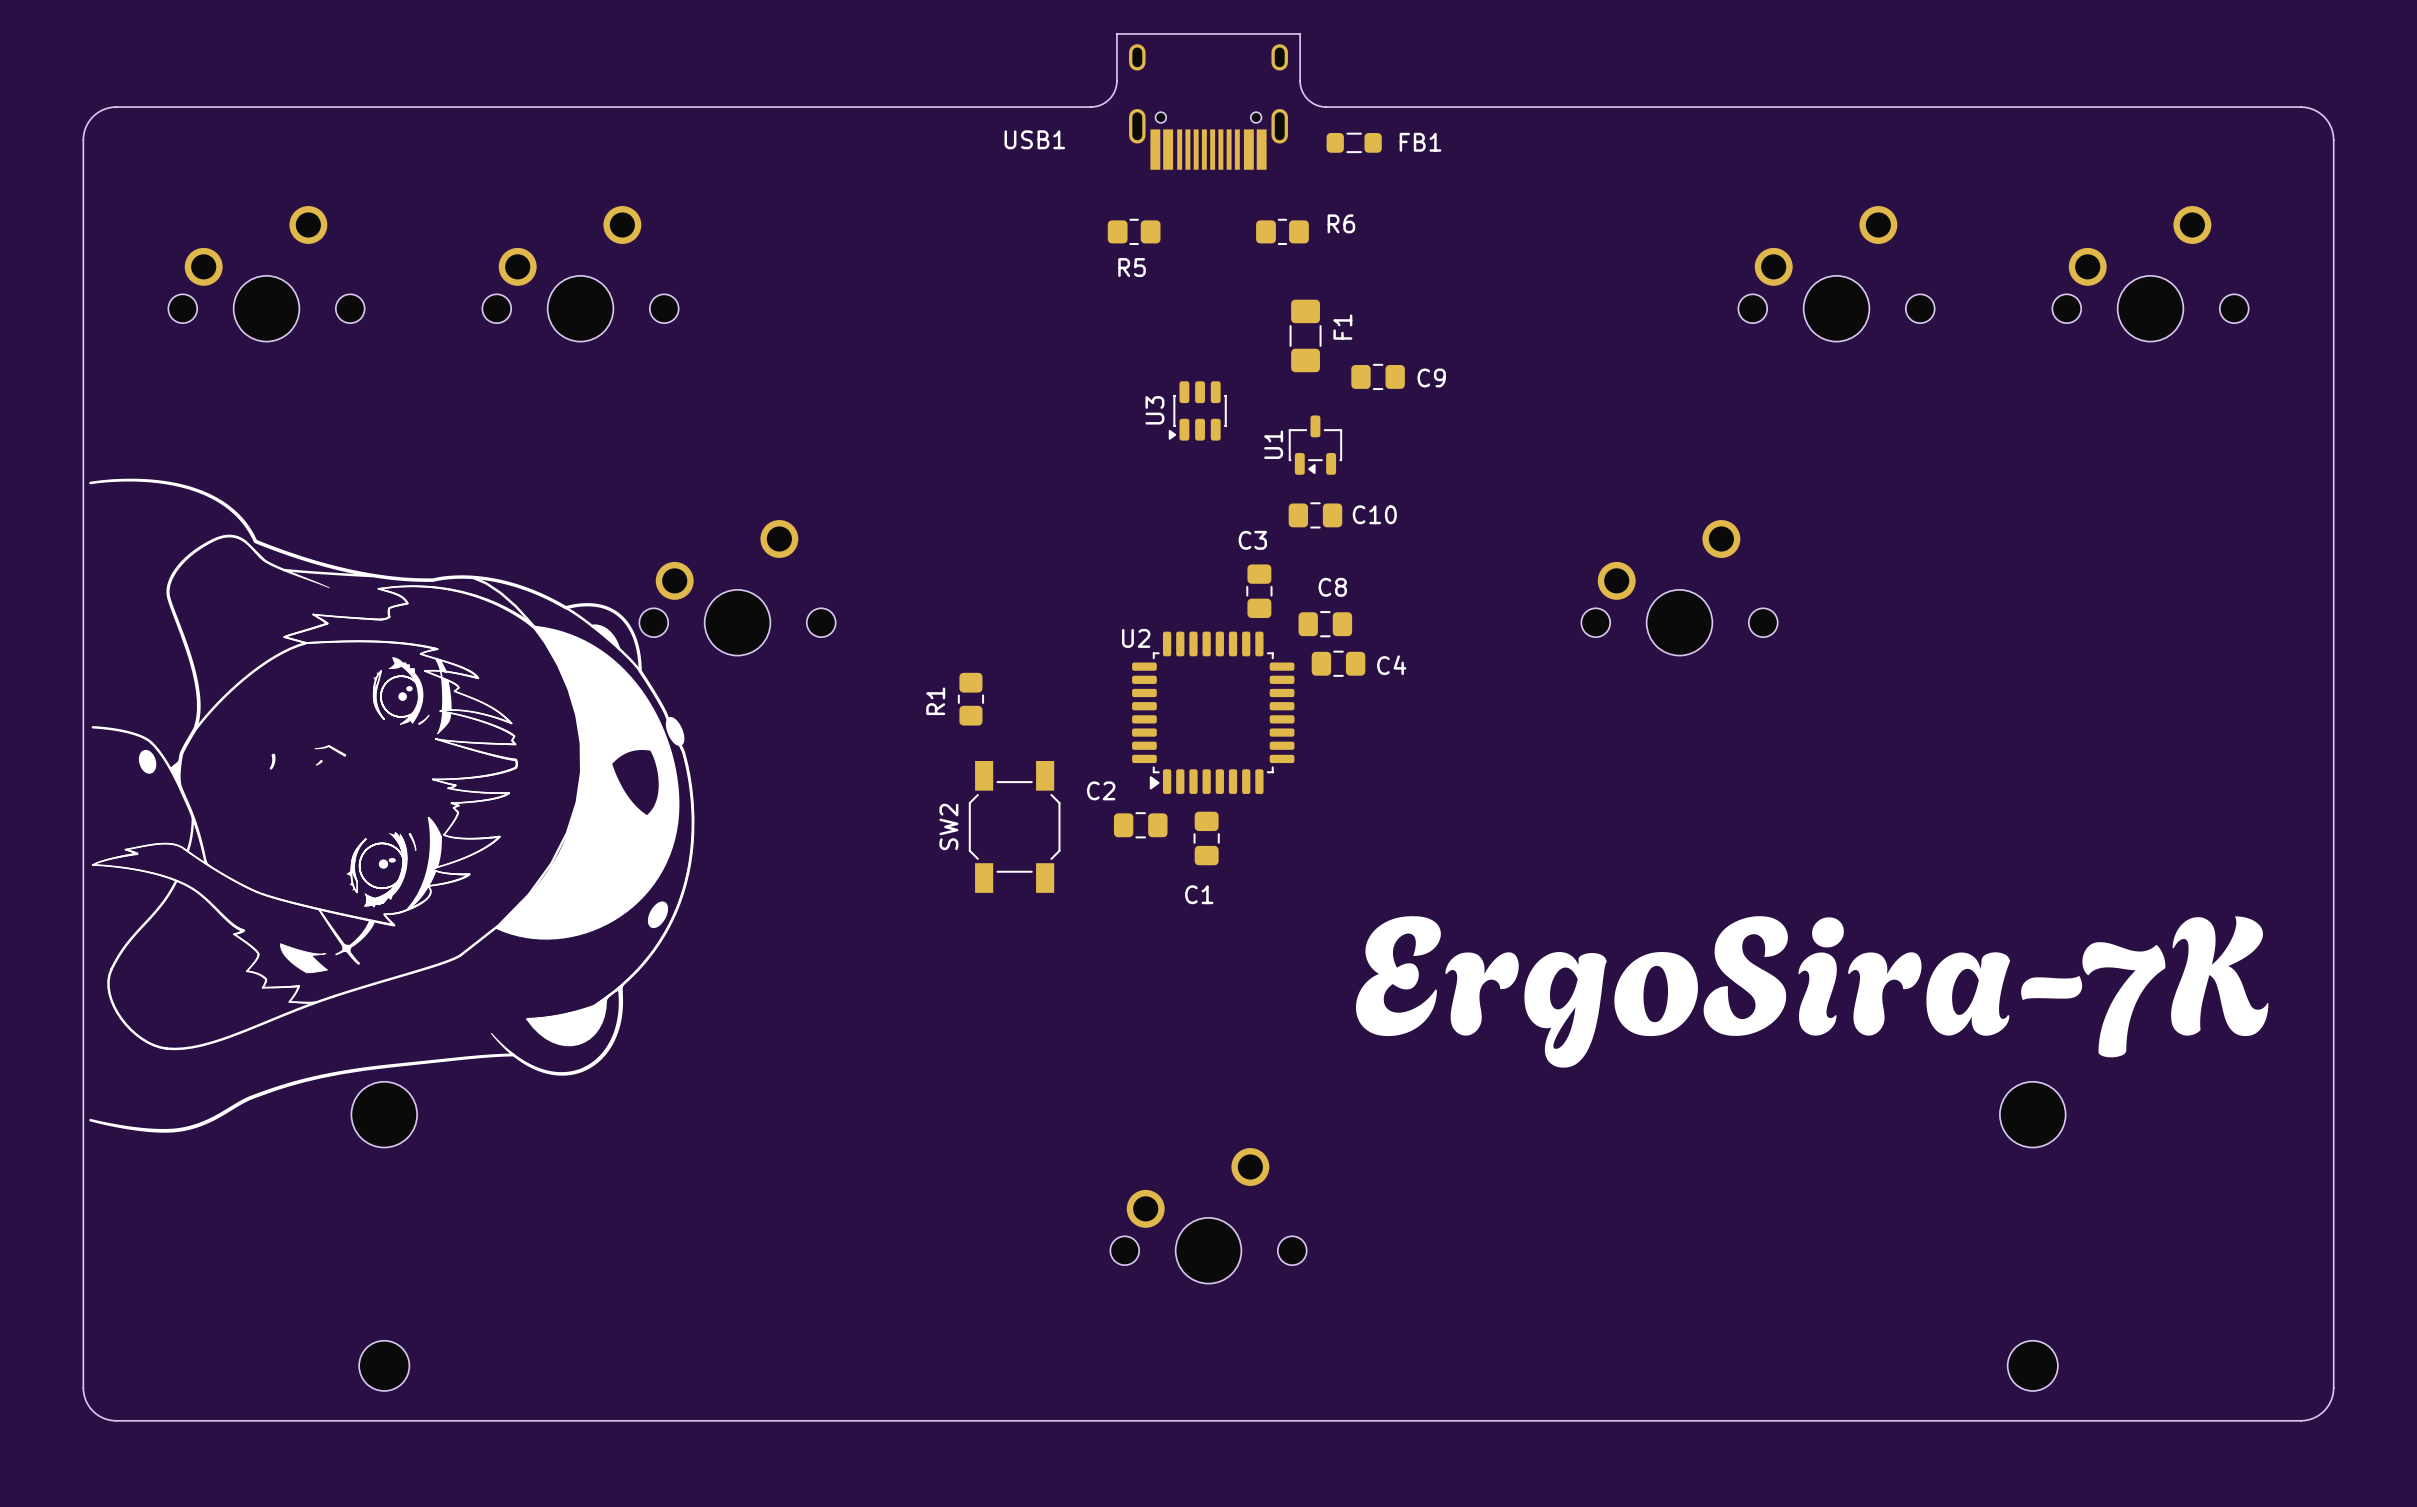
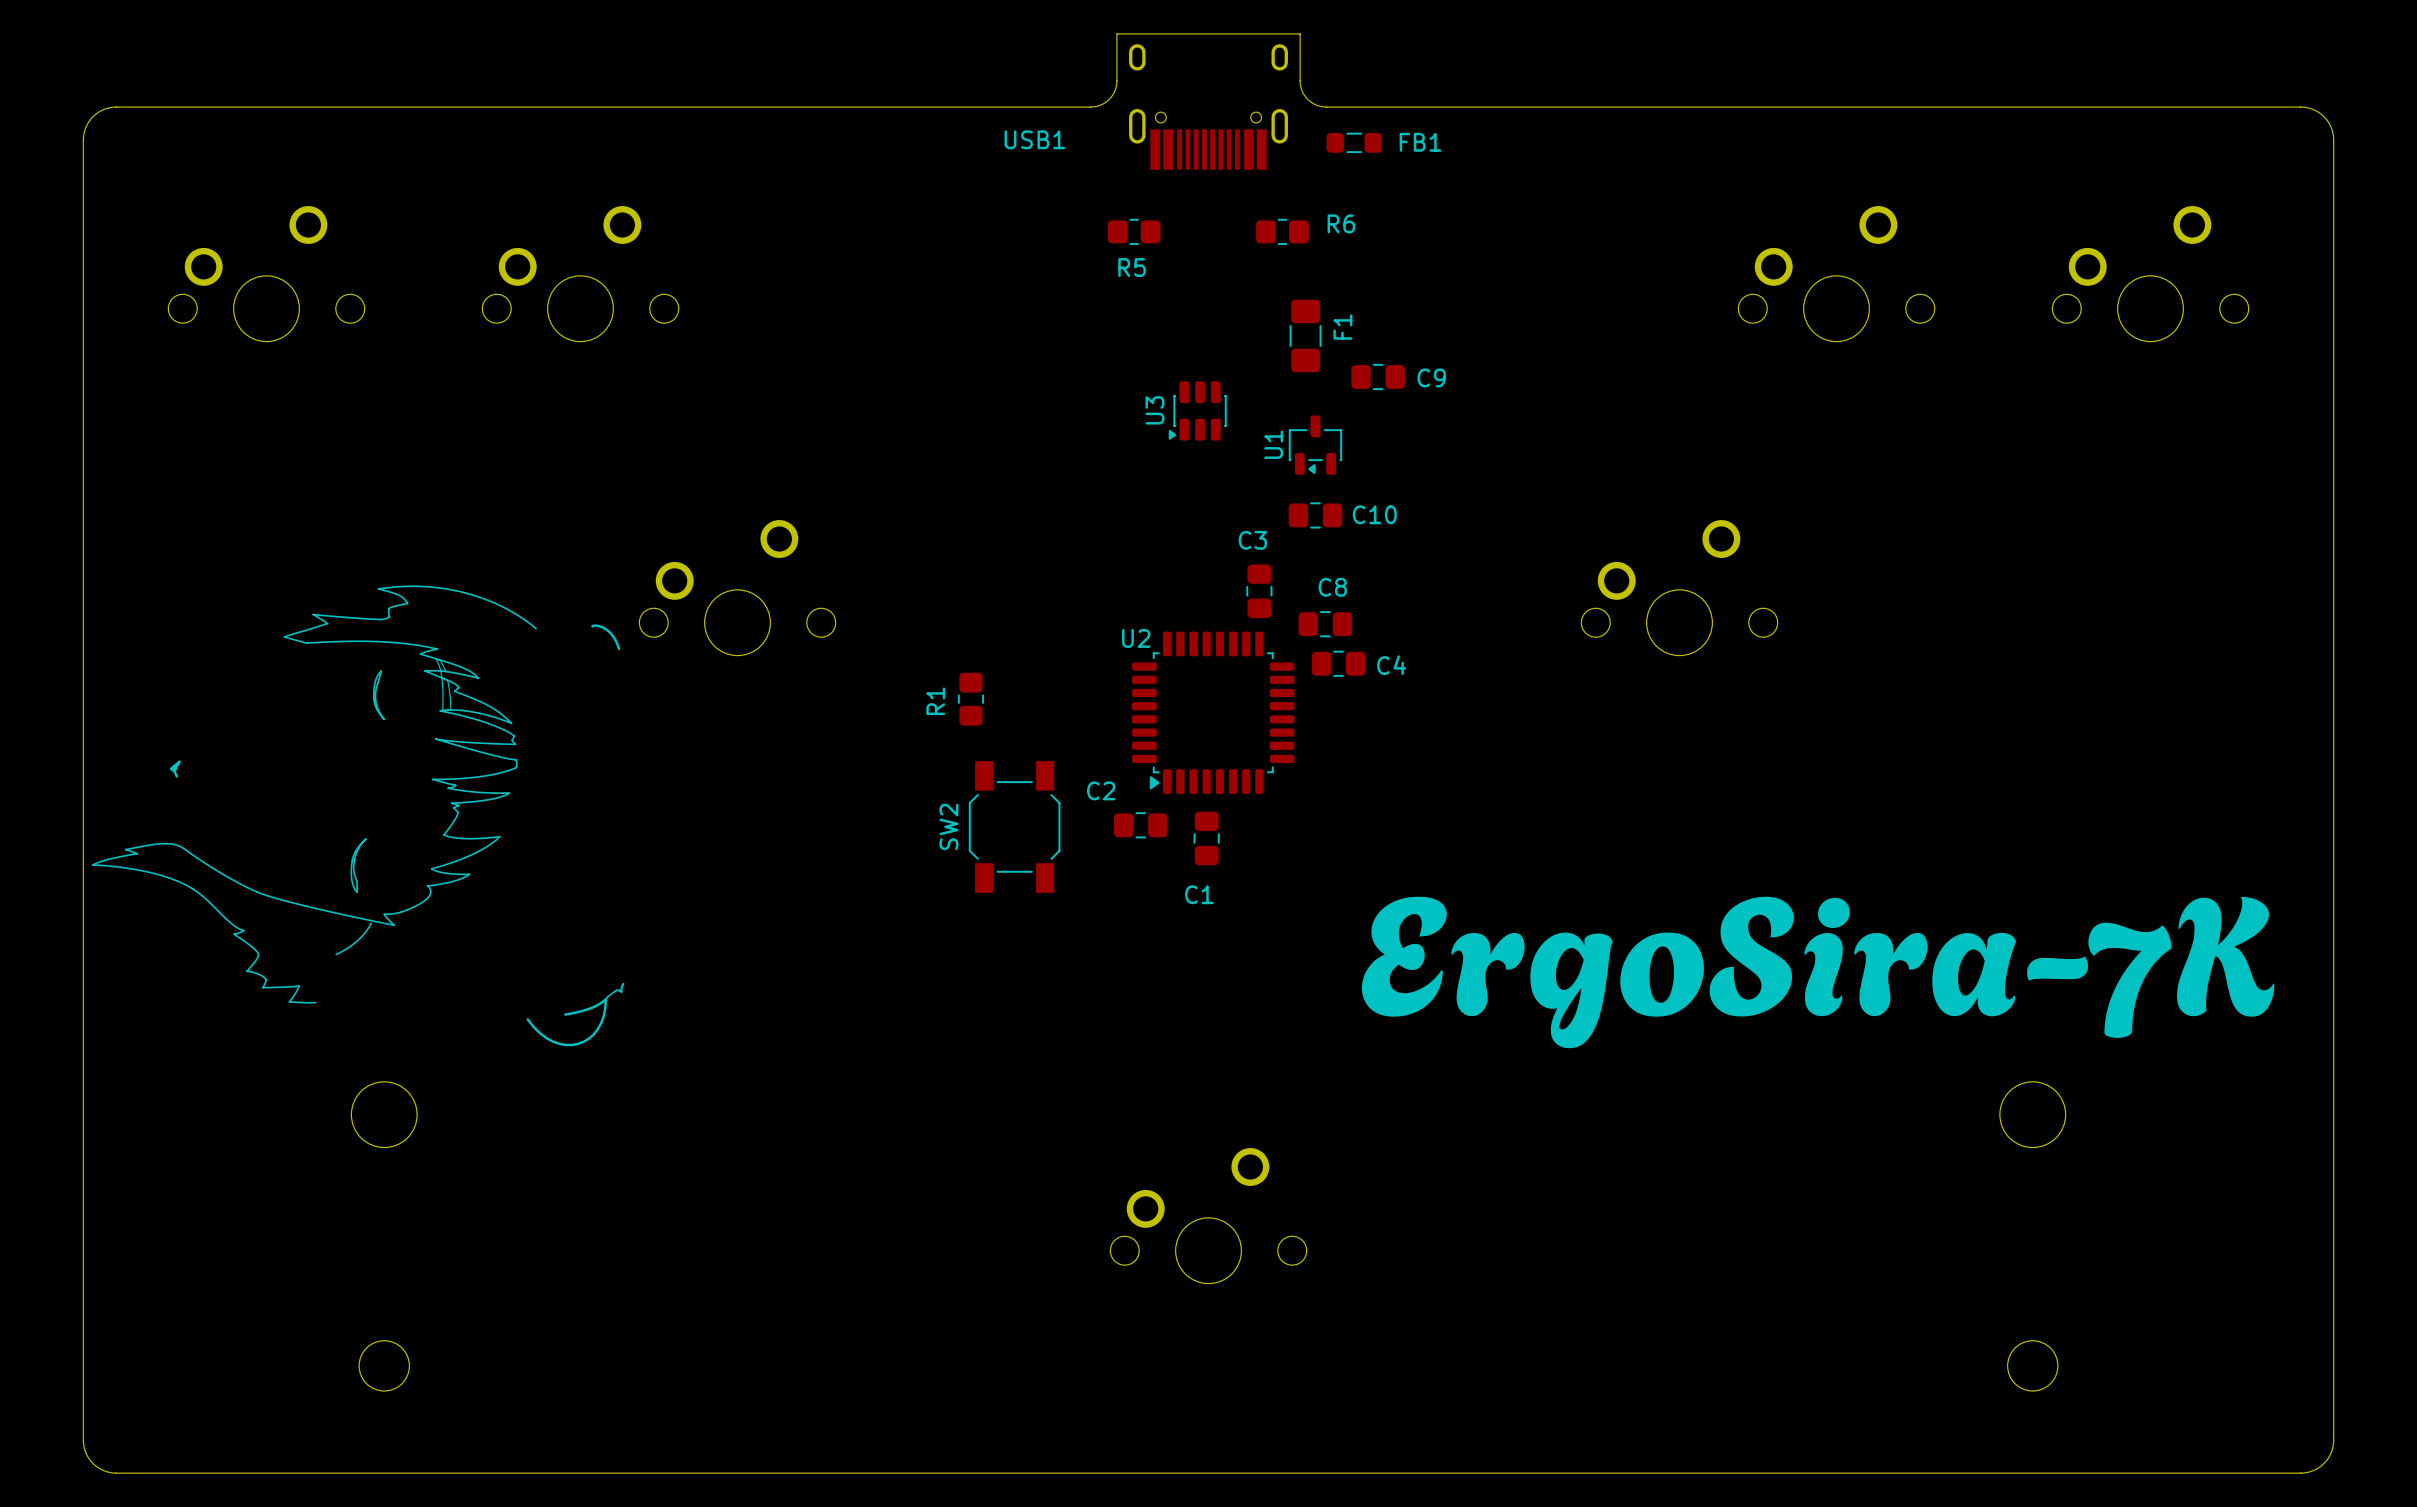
board edge: (2300, 107) (2313, 109) (2324, 116) (2331, 127) (2333, 140) (2333, 1387) (2328, 1405) (2318, 1415) (2300, 1420) (116, 1420) (102, 1417) (93, 1411) (86, 1402) (83, 1387) -> (2300, 107) (2315, 110) (2324, 116) (2331, 129) (2333, 140) (2333, 1440) (2328, 1457) (2318, 1468) (2300, 1473) (116, 1473) (98, 1468) (90, 1460) (85, 1451) (83, 1440) (83, 1387)
drawing: [89, 478, 695, 1133] -> none
line: (283, 570) (371, 576) -> none
line: (472, 577) (500, 593) (531, 623) (557, 664) (568, 689) (576, 715) (580, 743) (581, 772) (576, 802) (567, 833) (551, 864) (528, 894) (498, 925) (454, 958) (321, 1000) (220, 1039) (192, 1047) (174, 1048) (154, 1045) (130, 1029) (114, 1006) (109, 993) (108, 981) (111, 969) (122, 949) (160, 905) (176, 881) -> none
line: (565, 607) (611, 642) (641, 673) -> none
line: (306, 643) (283, 652) (252, 672) (223, 697) (196, 728) -> none
line: (399, 676) (391, 678) (385, 683) (381, 690) (381, 698) (383, 706) (388, 712) (395, 716) (403, 716) (411, 714) (417, 709) (420, 702) (421, 694) (419, 686) (414, 680) (407, 677) (399, 676) -> none
line: (92, 727) (121, 730) (145, 738) (161, 755) (180, 788) (176, 776) -> none
line: (192, 816) (187, 850) -> none
line: (428, 817) (430, 842) (427, 871) (418, 894) (407, 909) (426, 889) (435, 871) (430, 868) (436, 867) (438, 860) (441, 837) (428, 817) -> none
line: (379, 843) (371, 846) (364, 851) (360, 859) (359, 868) (362, 876) (367, 883) (375, 887) (384, 888) (392, 885) (399, 880) (403, 872) (404, 863) (401, 855) (396, 848) (388, 844) (379, 843) -> none
drawing position: (1827, 932) -> (1833, 912)
drawing position: (1398, 976) -> (1404, 956)
drawing position: (1745, 976) -> (1751, 956)
drawing position: (2219, 976) -> (2225, 956)
drawing position: (2051, 987) -> (2057, 968)
drawing position: (1482, 993) -> (1488, 974)
drawing position: (1884, 993) -> (1890, 974)
drawing position: (1656, 994) -> (1662, 974)
drawing position: (1817, 994) -> (1823, 974)
drawing position: (1968, 994) -> (1974, 974)
drawing position: (2123, 999) -> (2129, 980)
drawing position: (1565, 1009) -> (1571, 990)

